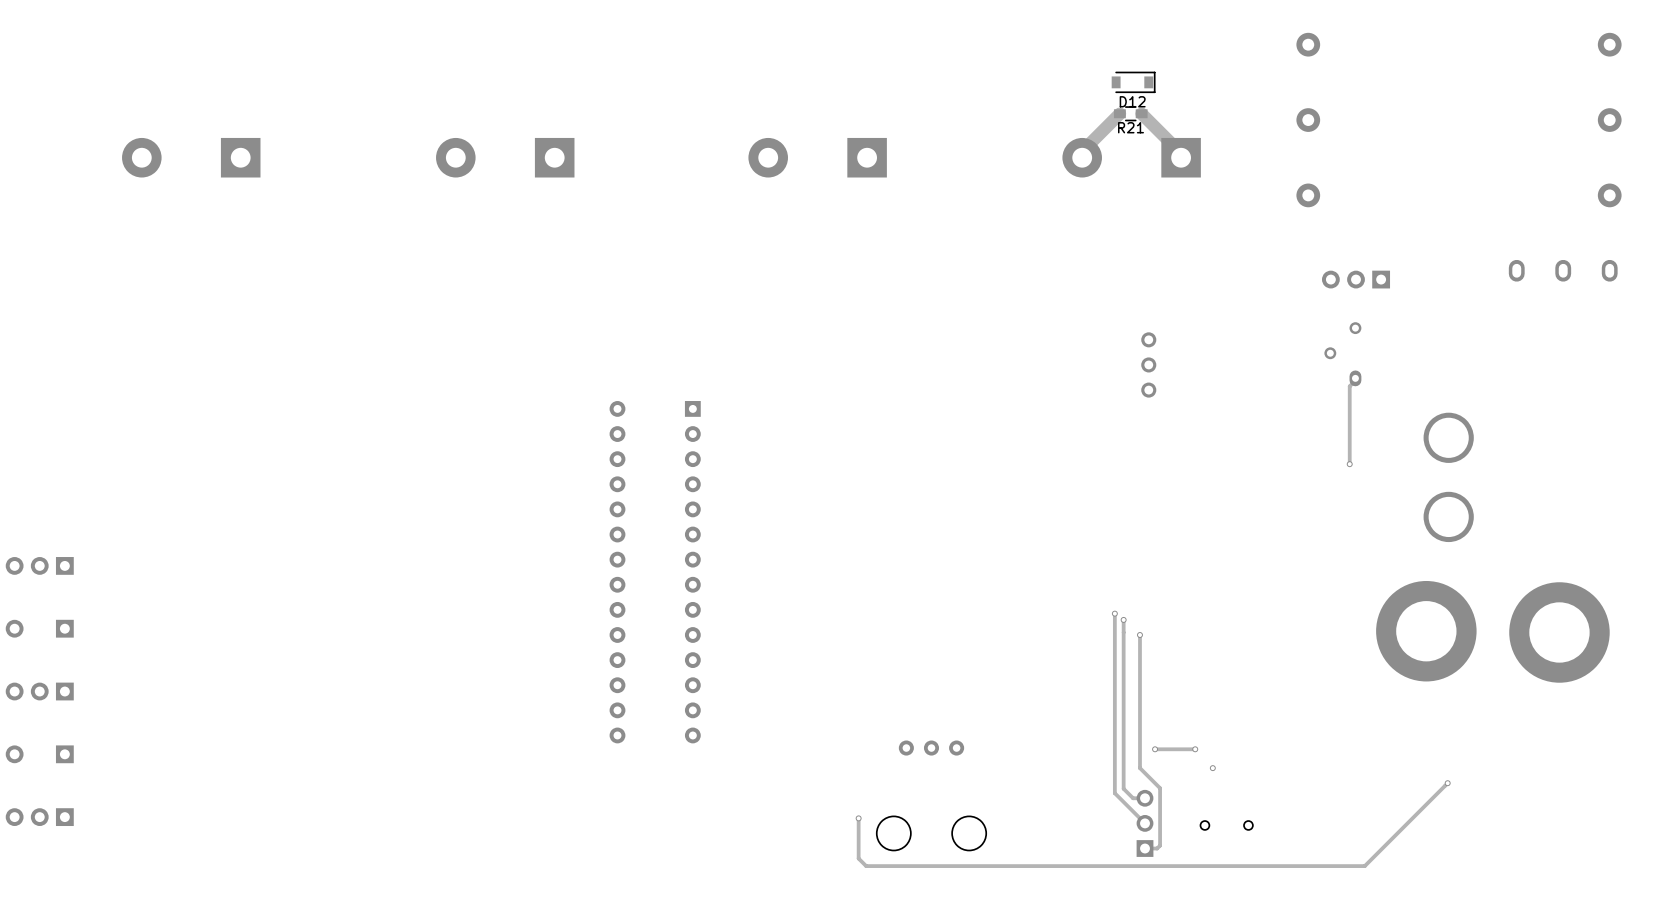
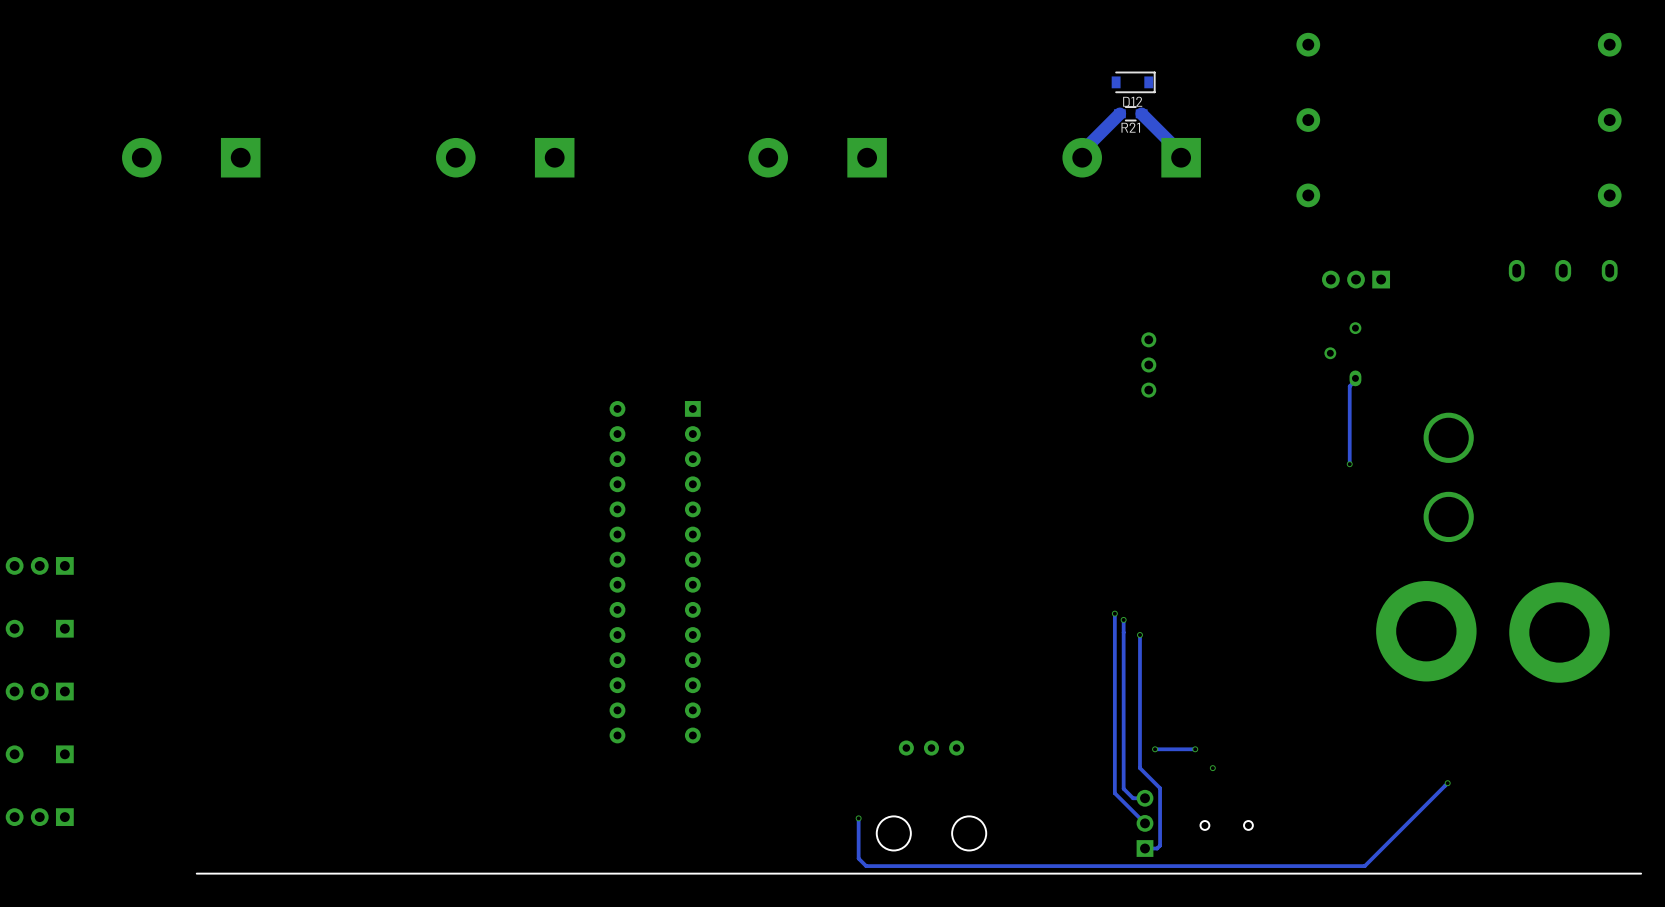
board edge: none -> (1641, 873) (196, 873)

